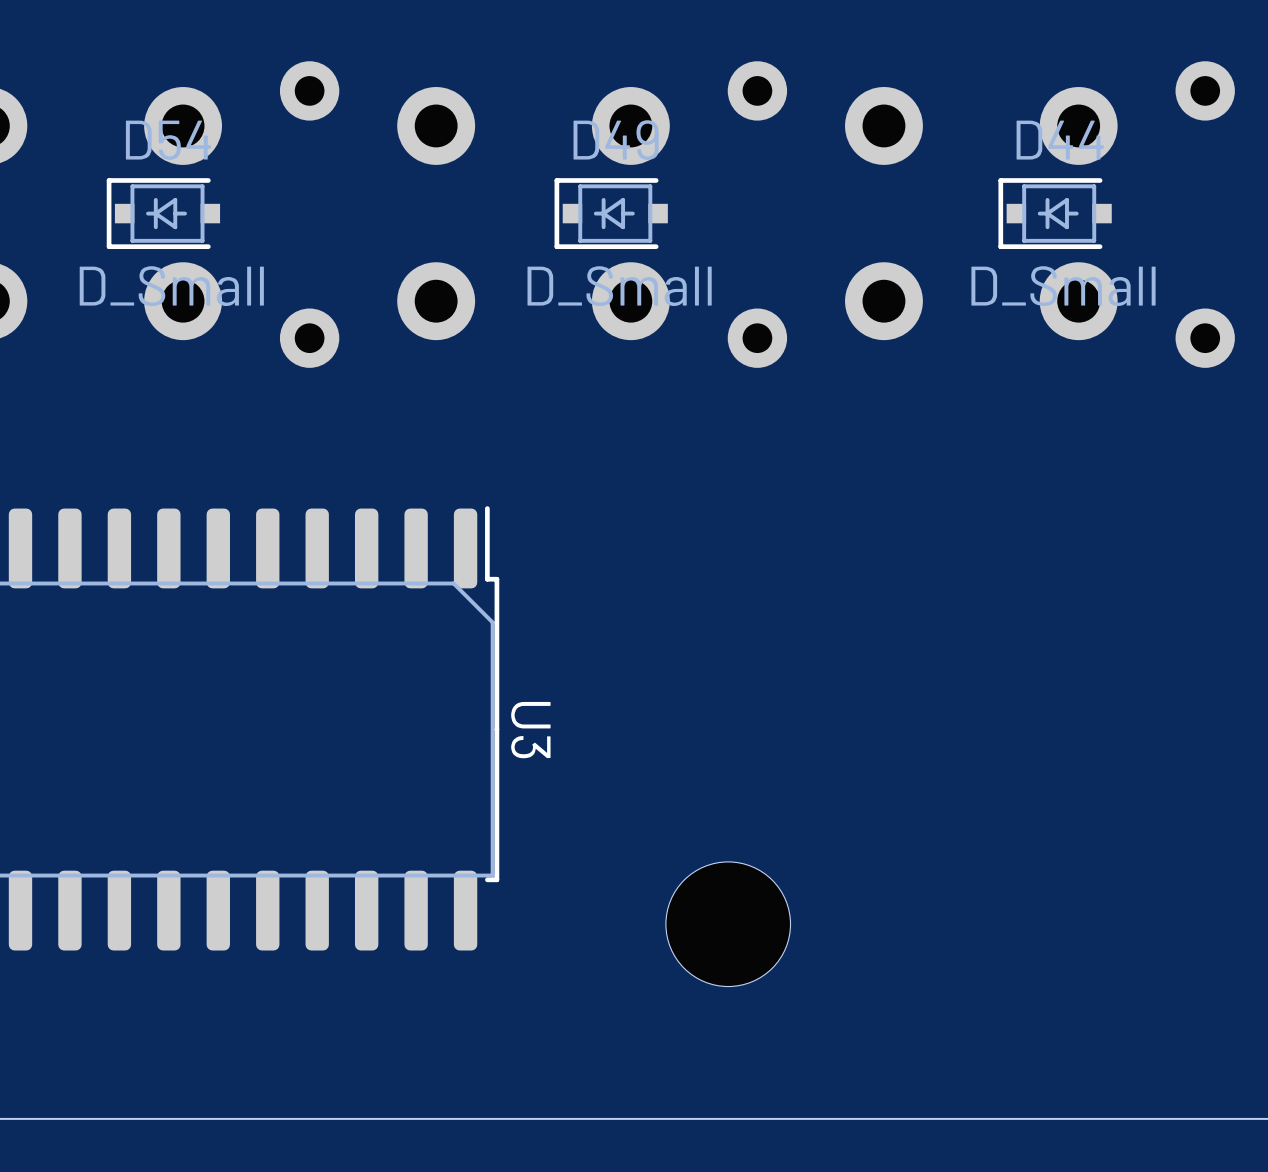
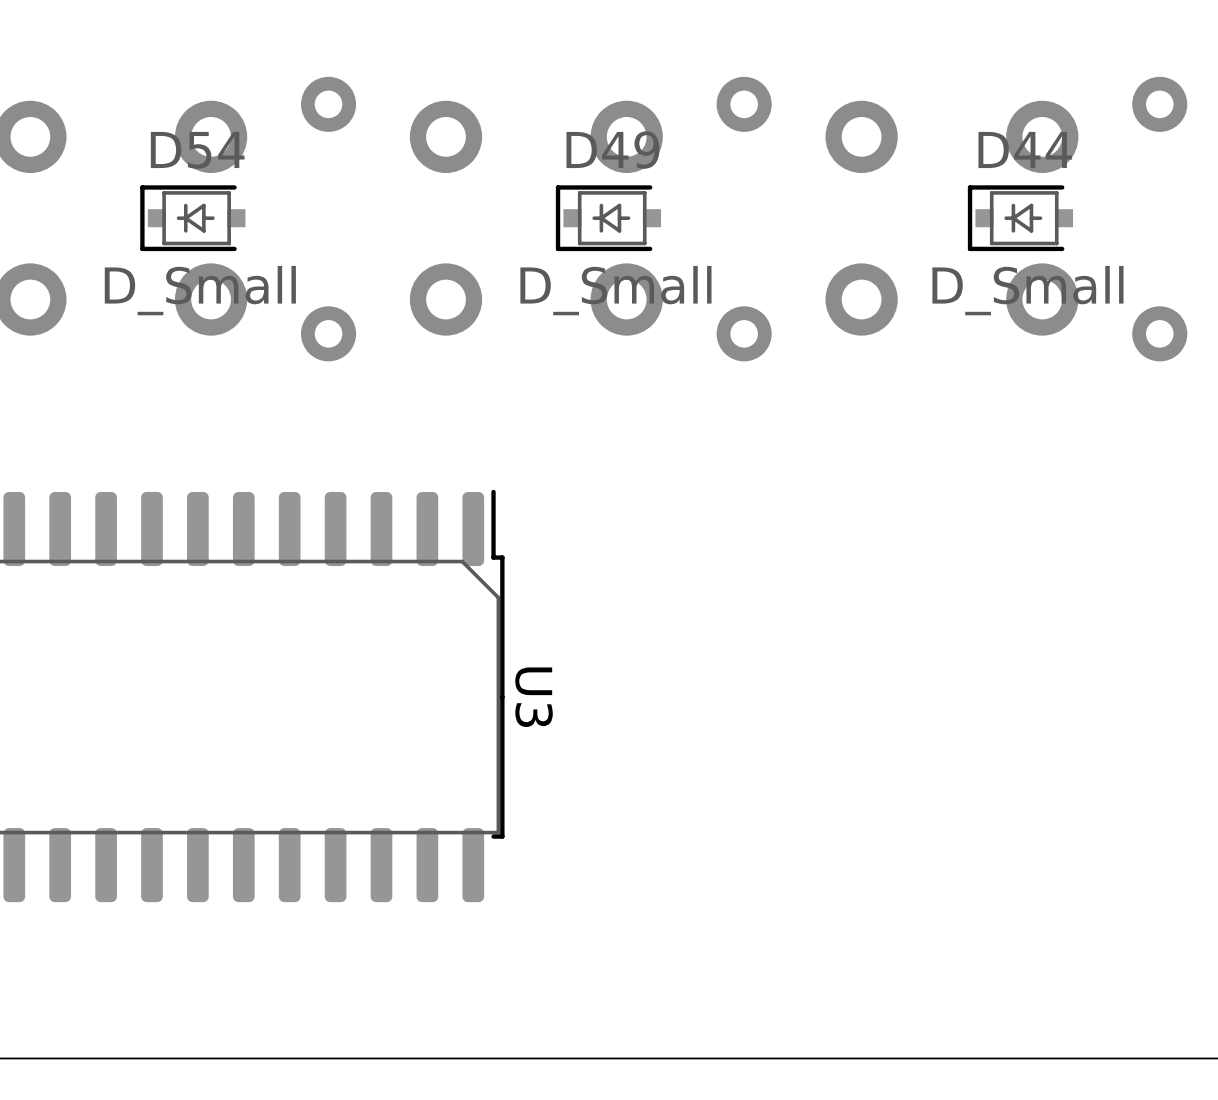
part: (728, 924) -> none

